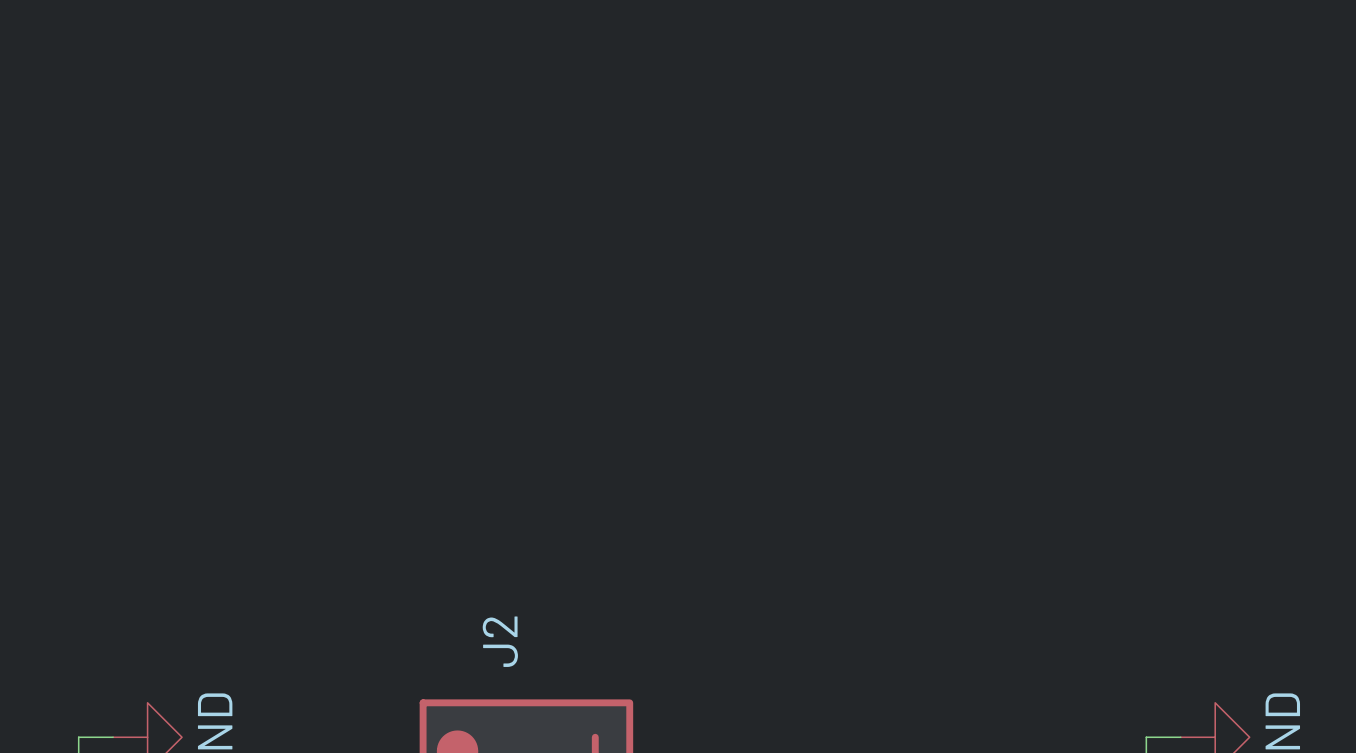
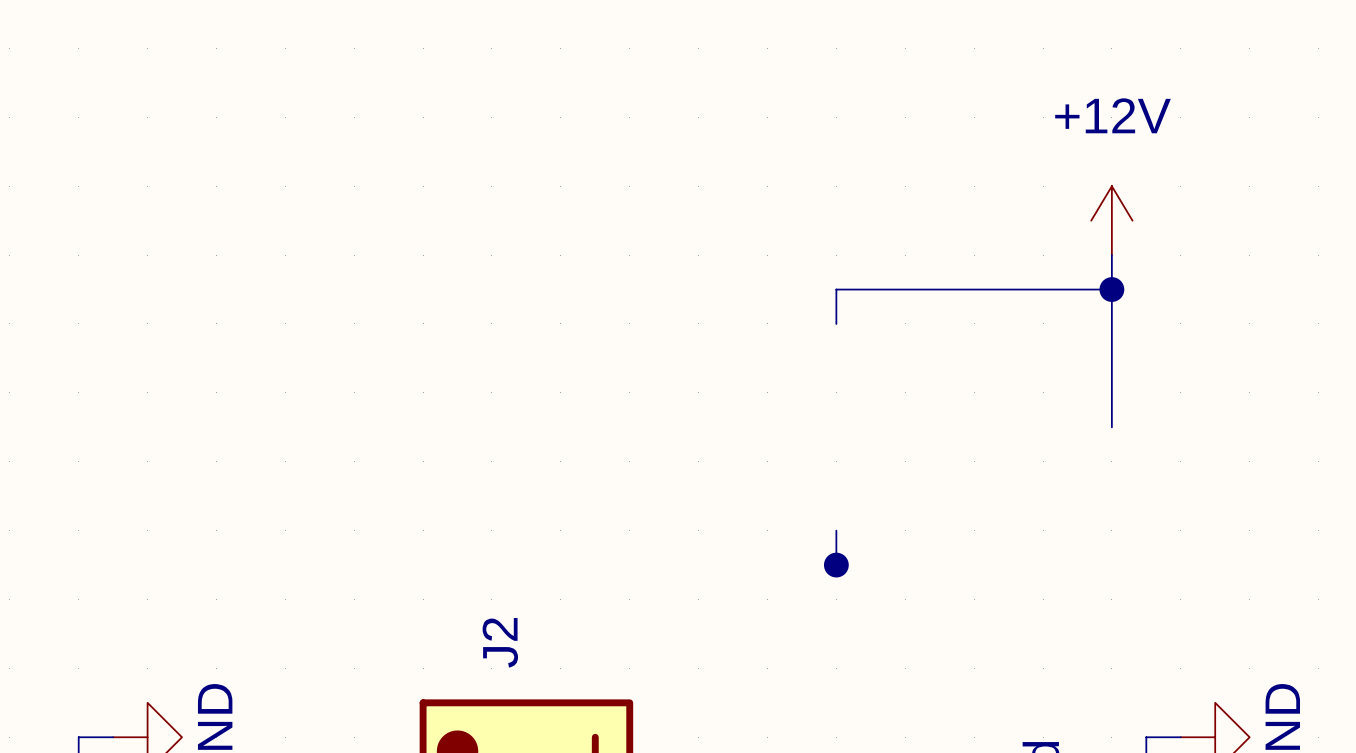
power symbol: none -> +12V (1111, 220)
wire: none -> (1111, 255) (1111, 427)
wire: none -> (1111, 289) (836, 289) (836, 323)
junction: none -> (1111, 289)
wire: none -> (836, 530) (836, 565)
junction: none -> (836, 565)

